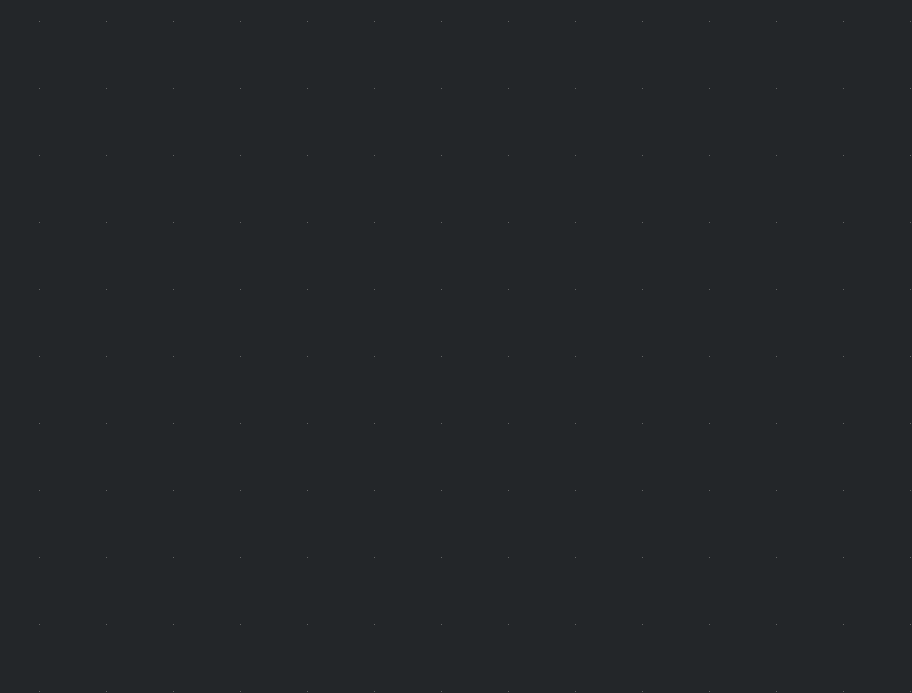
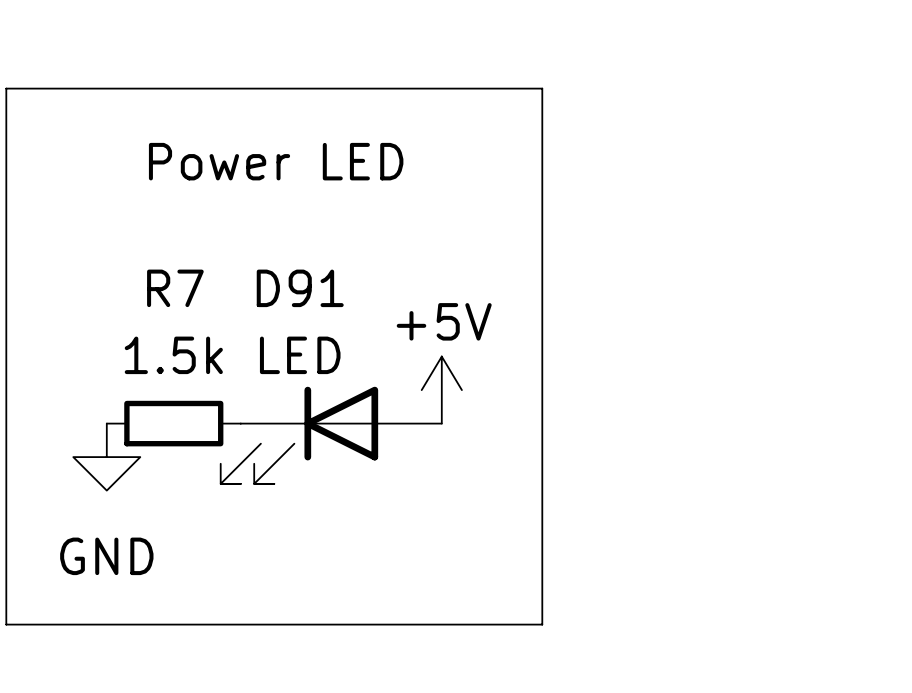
line: none -> (6, 88) (542, 88) (542, 624) (6, 624) (6, 88)
text: none -> Power LED (276, 161)
power symbol: none -> +5V (441, 390)
R7: none -> 1.5k (173, 423)
D91: none -> LED (331, 435)
power symbol: none -> GND (106, 457)

